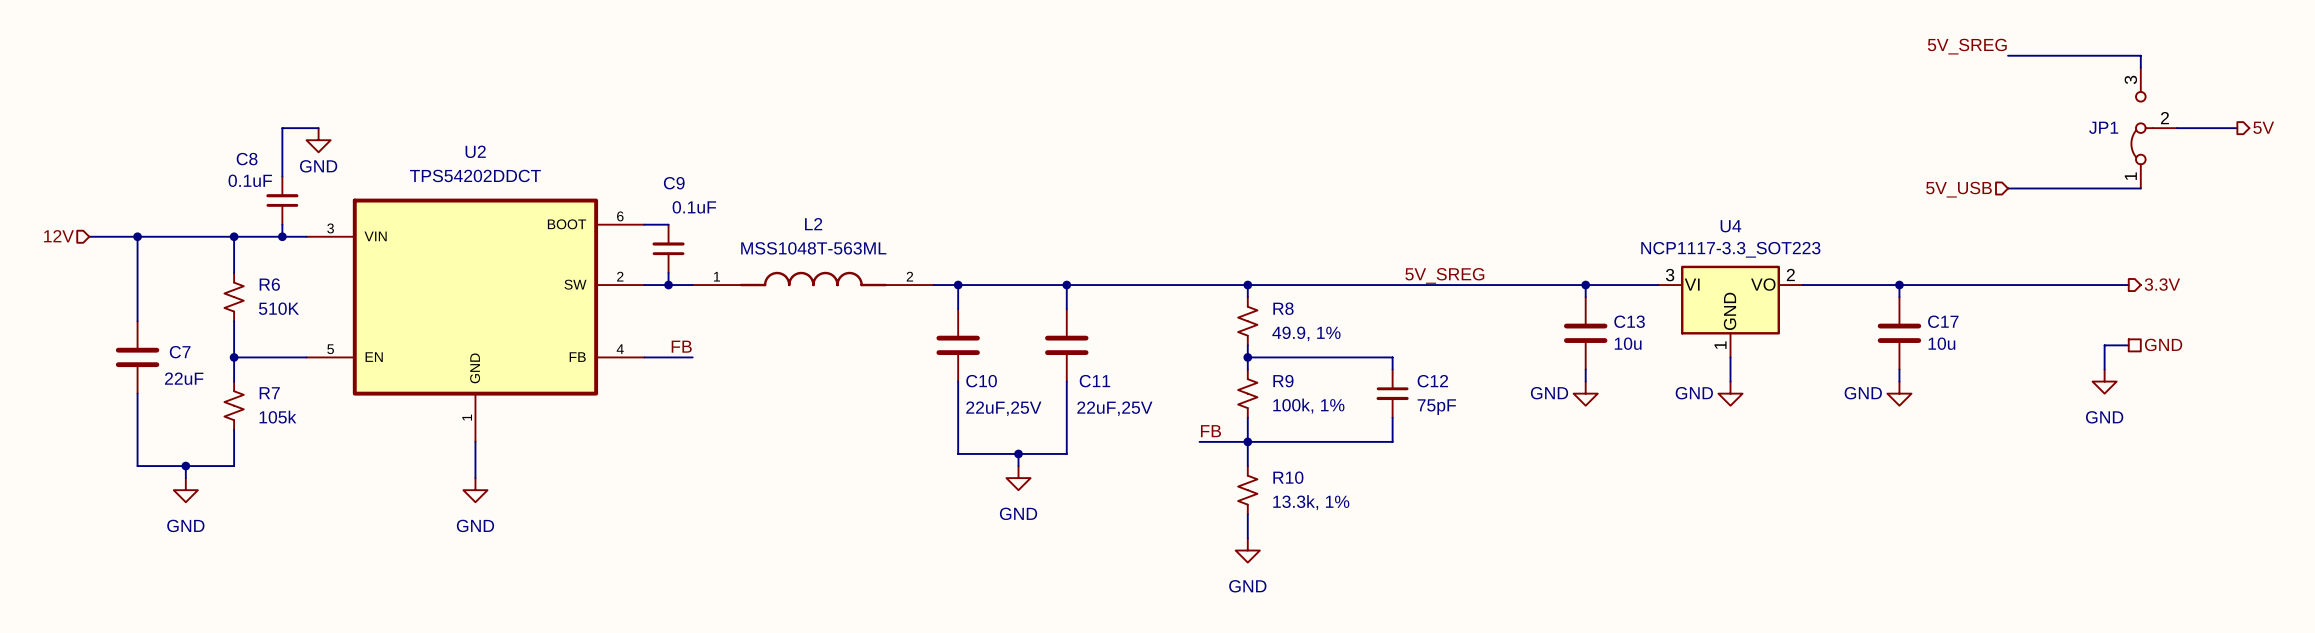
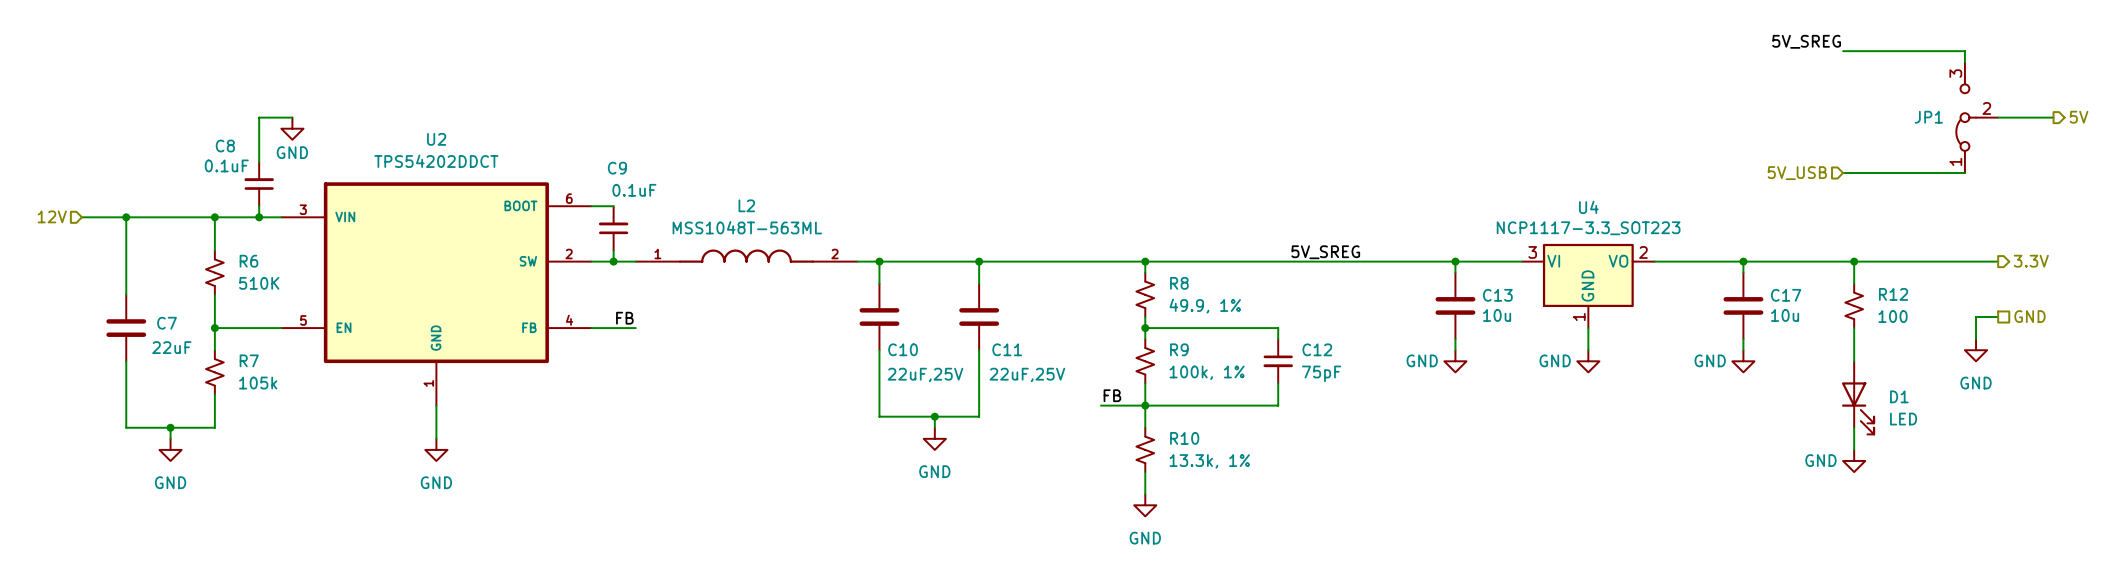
hierarchical label position: 3.3V (2162, 284) -> 3.3V (2031, 261)
wire: none -> (1854, 261) (1854, 283)
junction: none -> (1854, 261)
wire: none -> (1953, 261) (1998, 261)
R12: none -> 100 (1854, 305)
hierarchical label position: GND (2163, 344) -> GND (2029, 316)
wire: (2128, 345) (2104, 345) (2104, 369) -> (1998, 316) (1976, 316) (1976, 339)
wire: none -> (1854, 328) (1854, 361)
power symbol position: GND (2104, 381) -> GND (1976, 350)
D1: none -> LED (1858, 397)
wire: none -> (1854, 427) (1854, 449)
power symbol: none -> GND (1854, 460)

